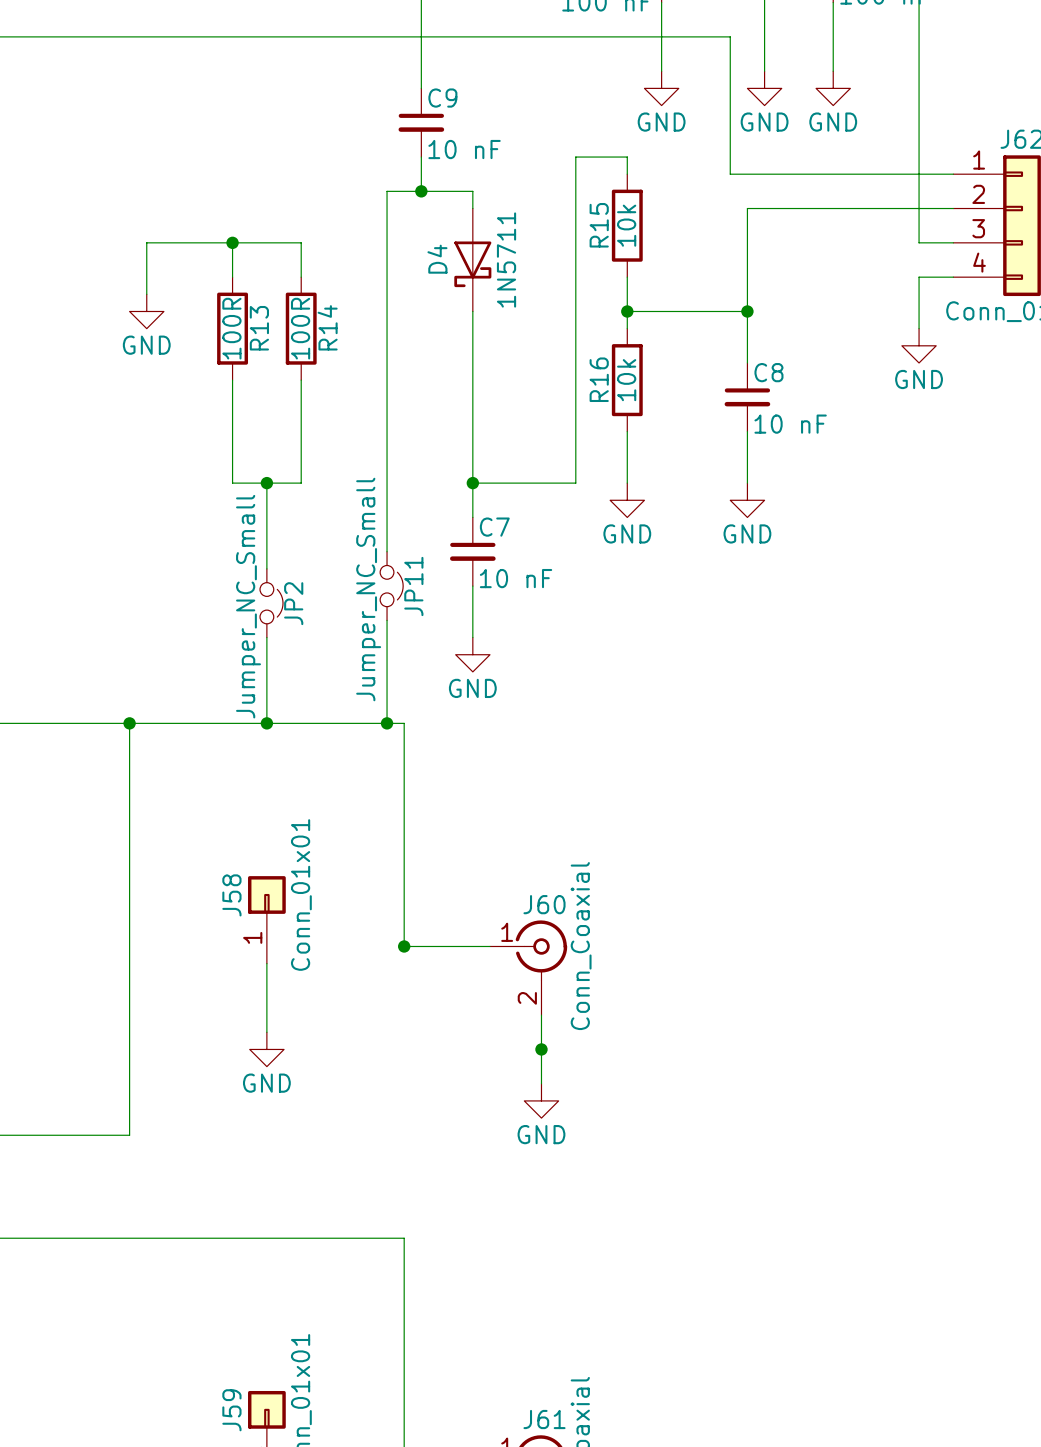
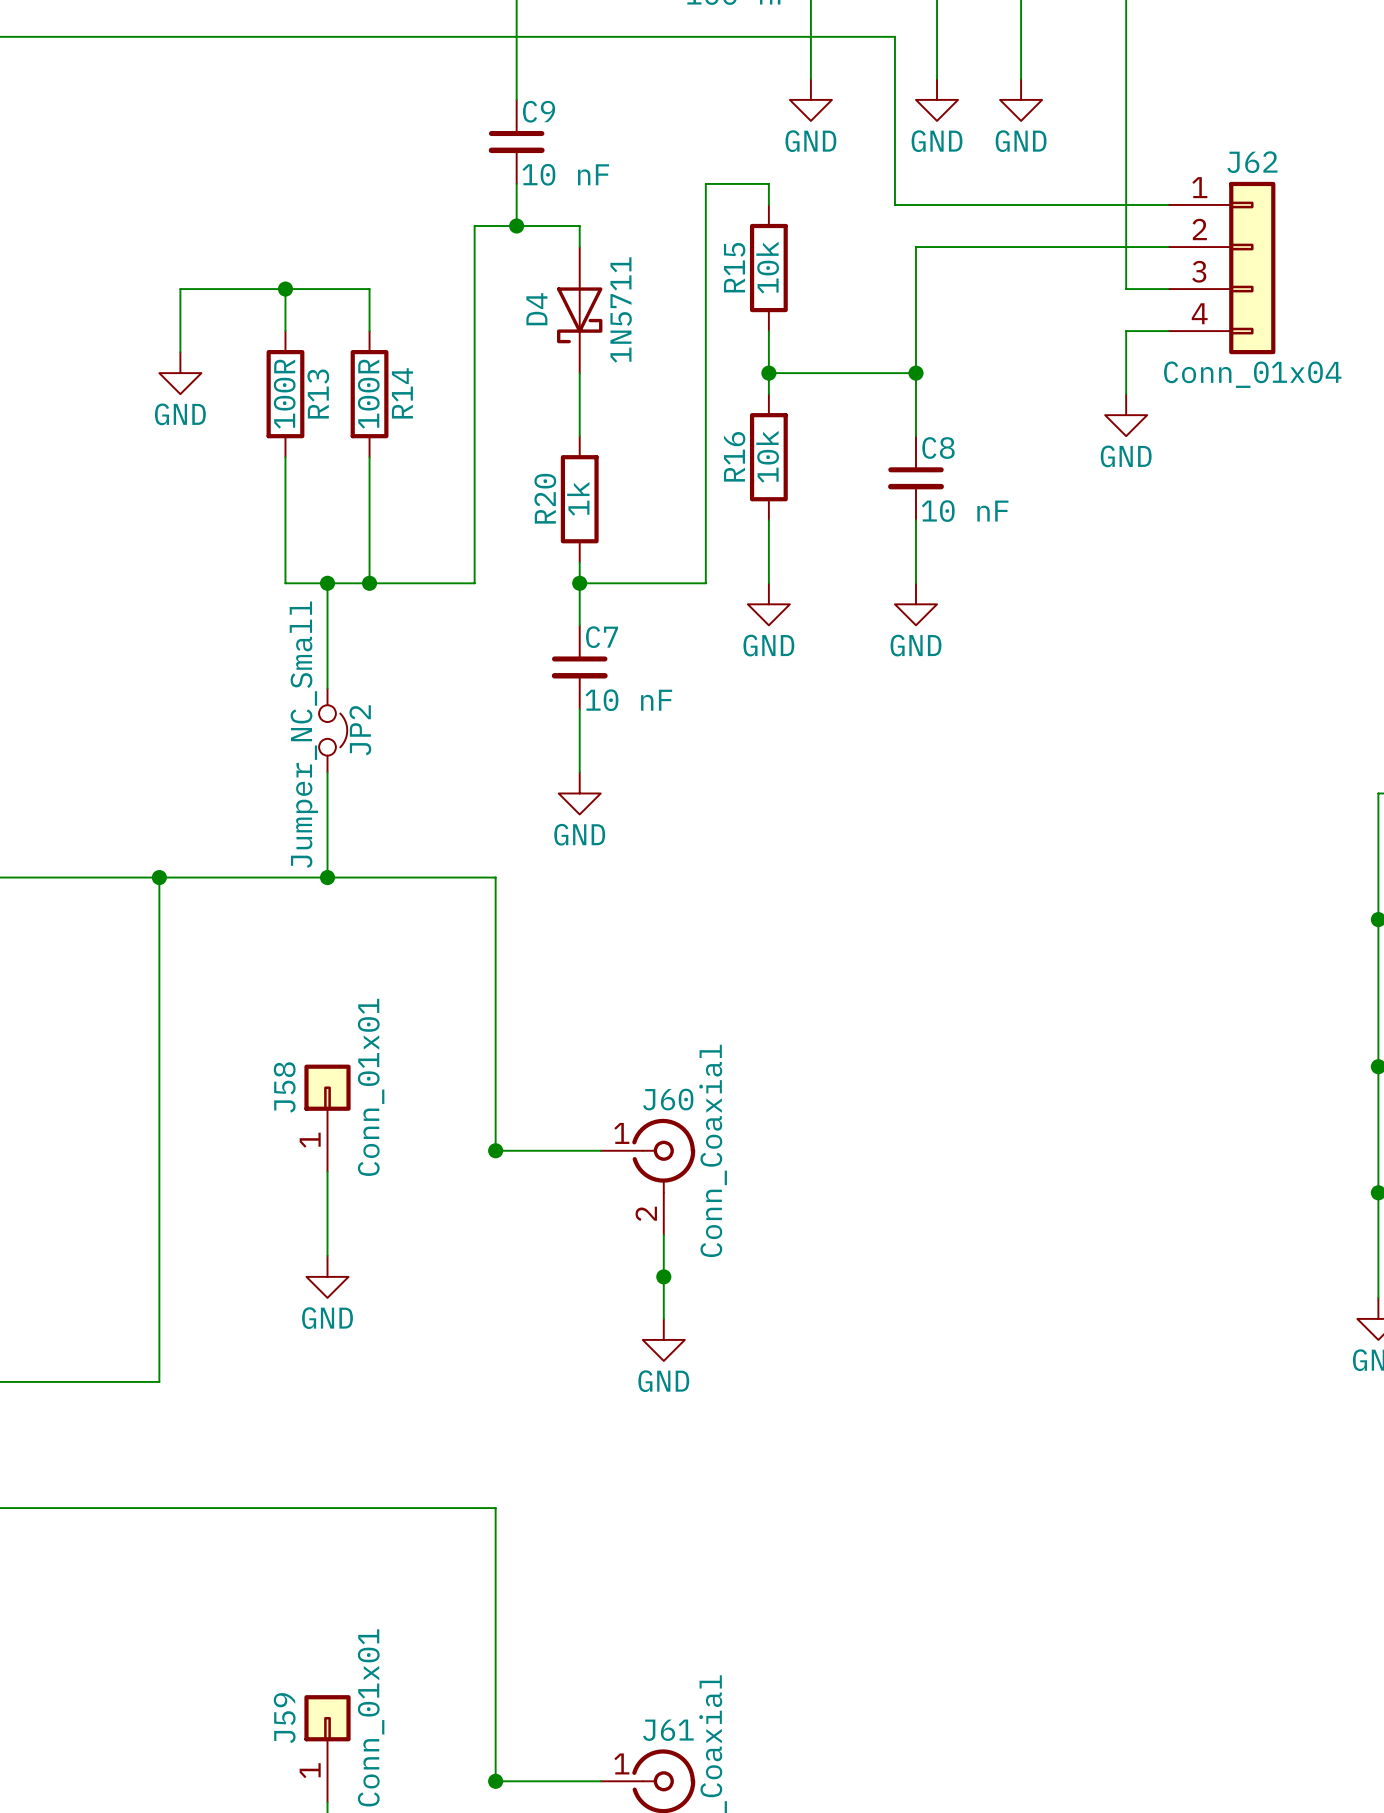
wire: (472, 362) (472, 465) -> none
R20: none -> 1k (579, 499)
junction: none -> (369, 583)
wire: (387, 483) (387, 551) -> (474, 583) (369, 583)
JP11: Jumper_NC_Small (391, 586) -> none
wire: (387, 620) (387, 723) -> none
junction: (387, 723) -> none

